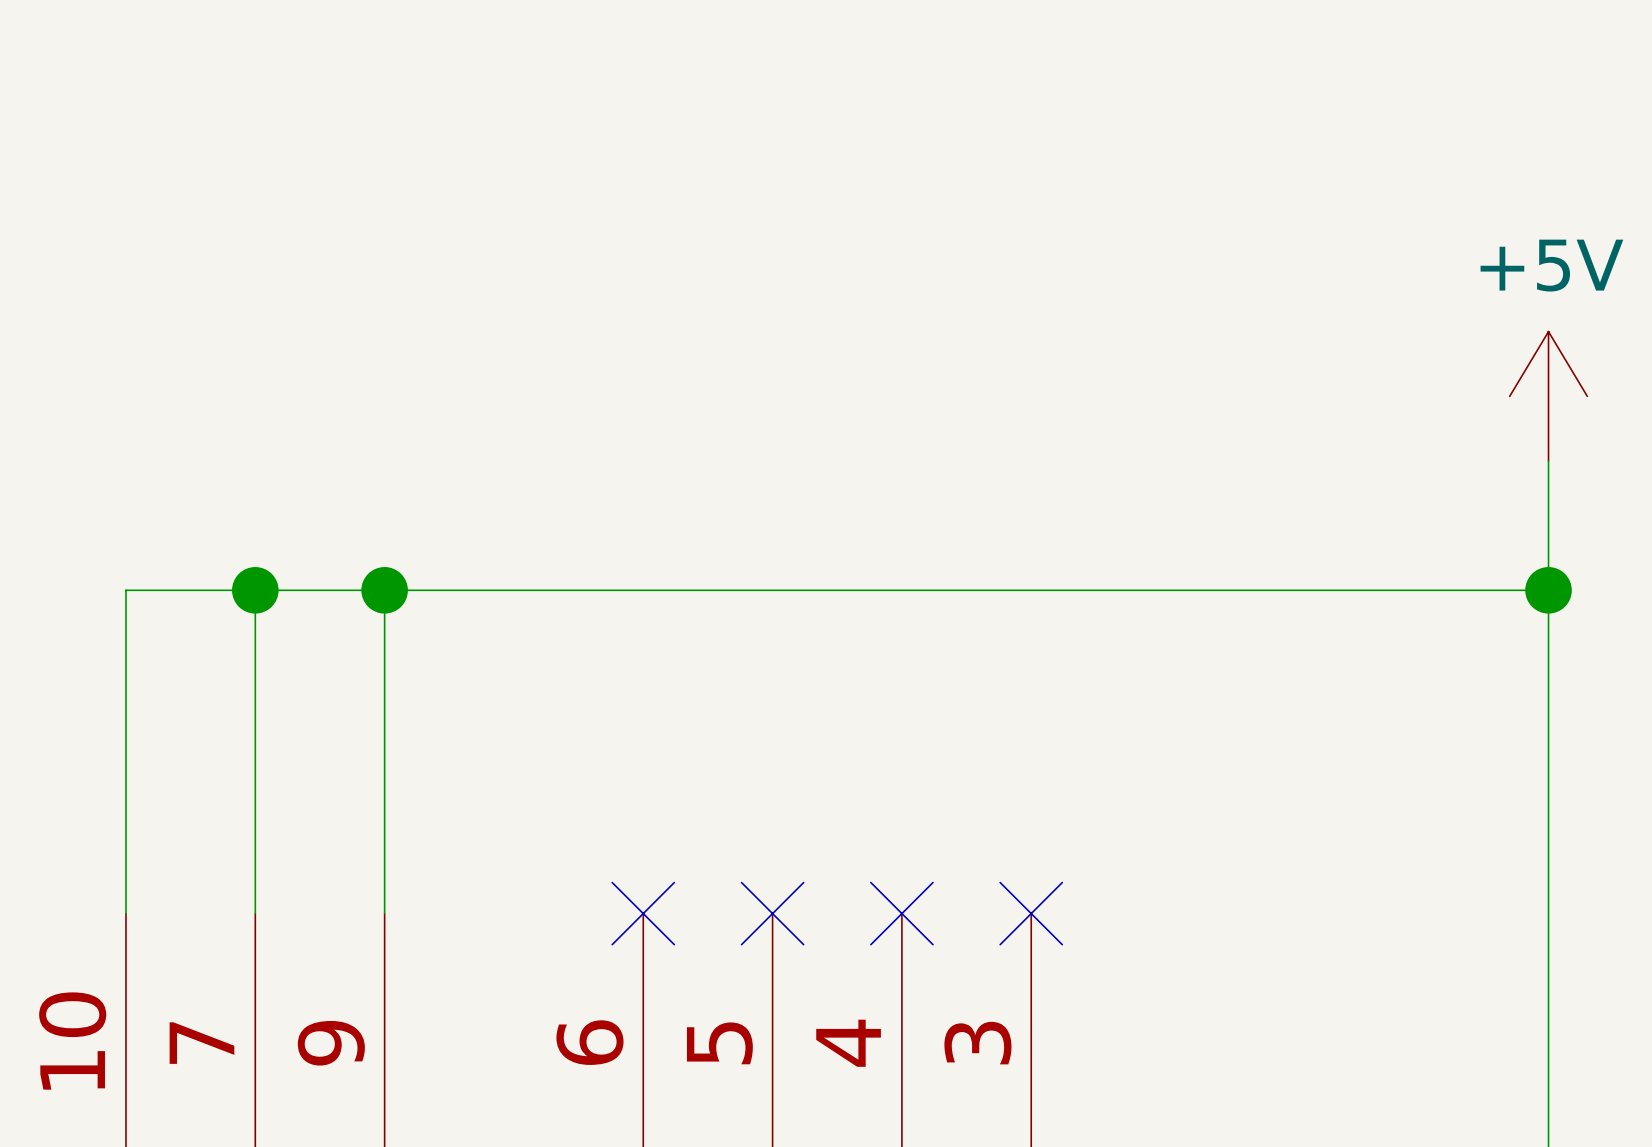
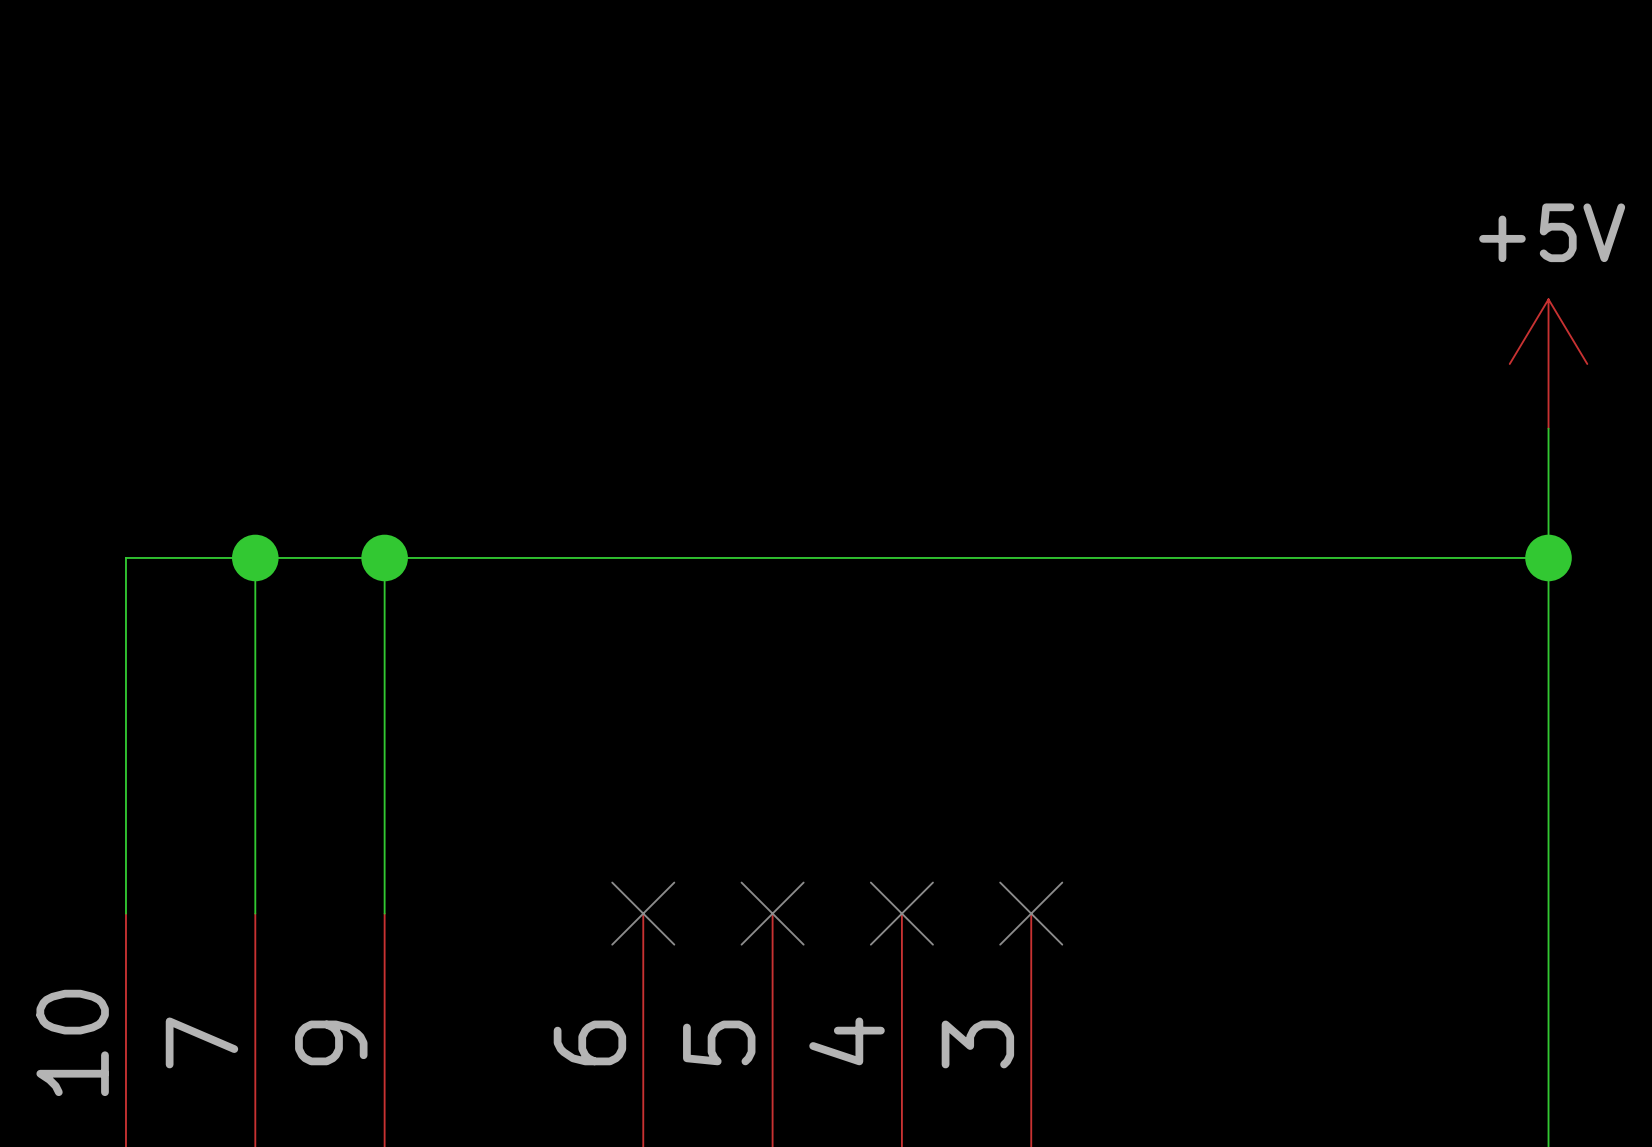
power symbol position: +5V (1548, 396) -> +5V (1548, 363)
wire: (125, 590) (1548, 590) -> (125, 590) (125, 557) (1548, 557)
junction position: (255, 590) -> (255, 557)
junction position: (384, 590) -> (384, 557)
junction position: (1548, 590) -> (1548, 557)

